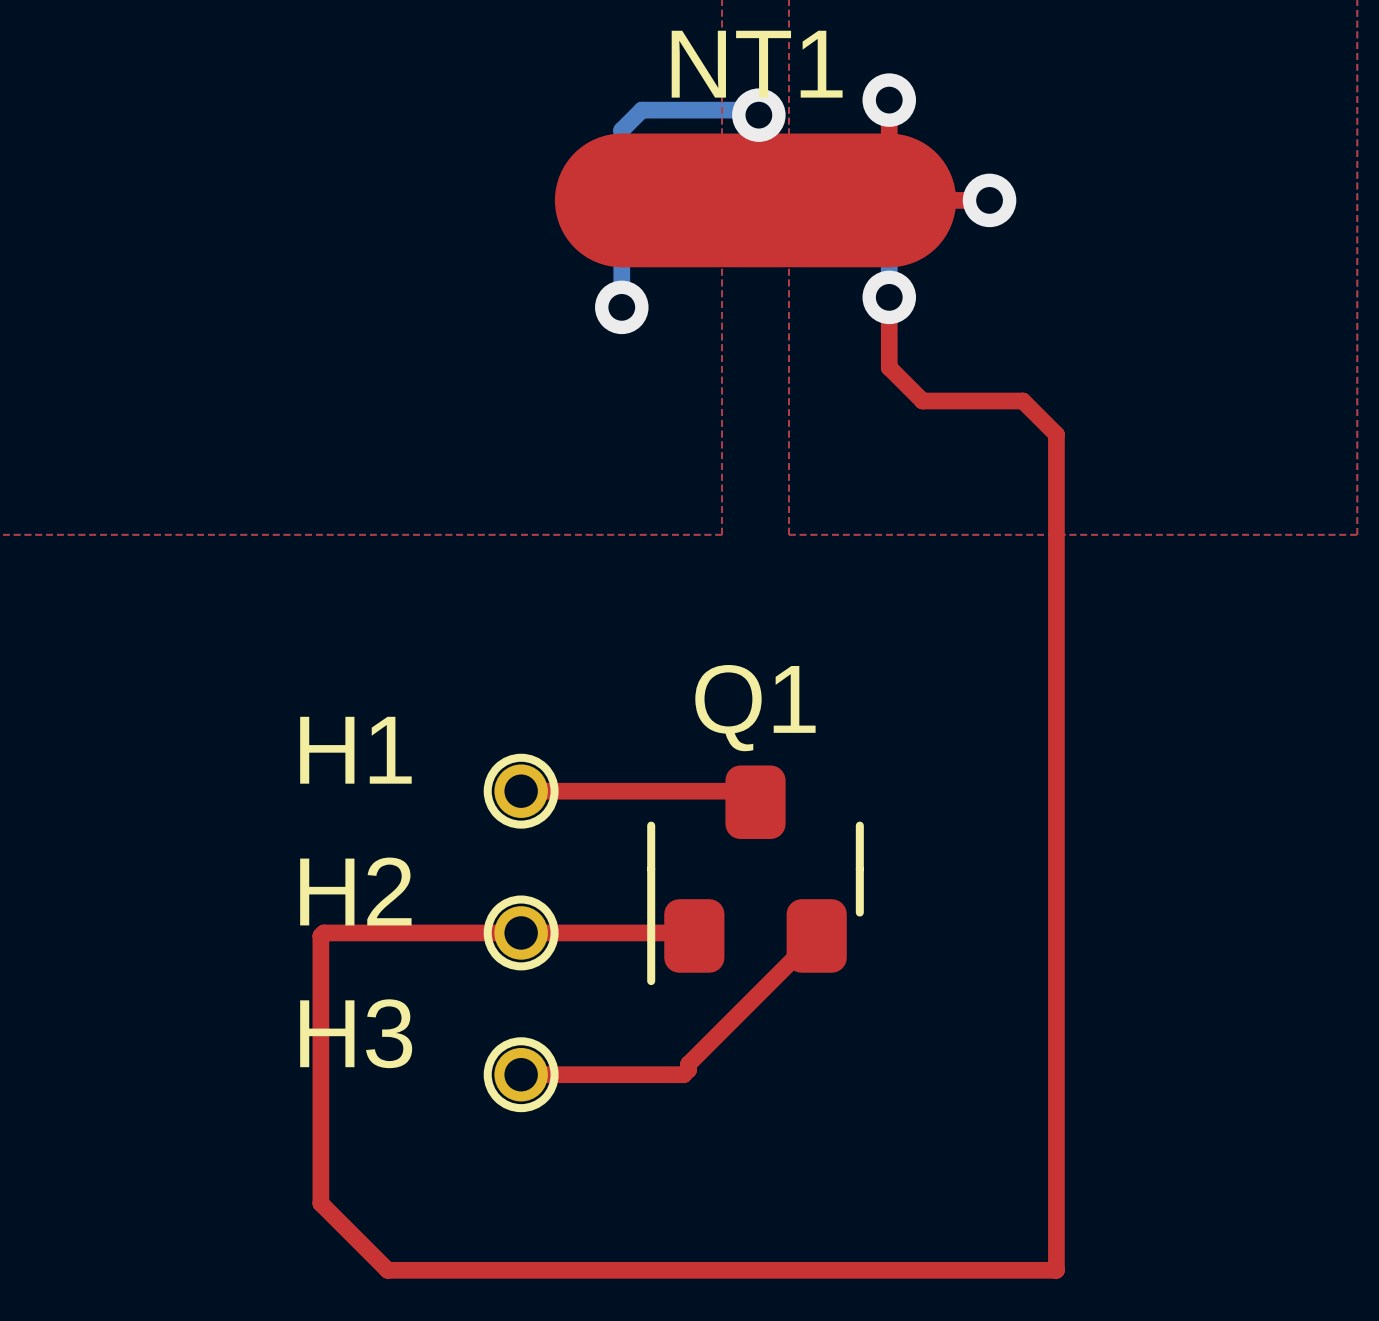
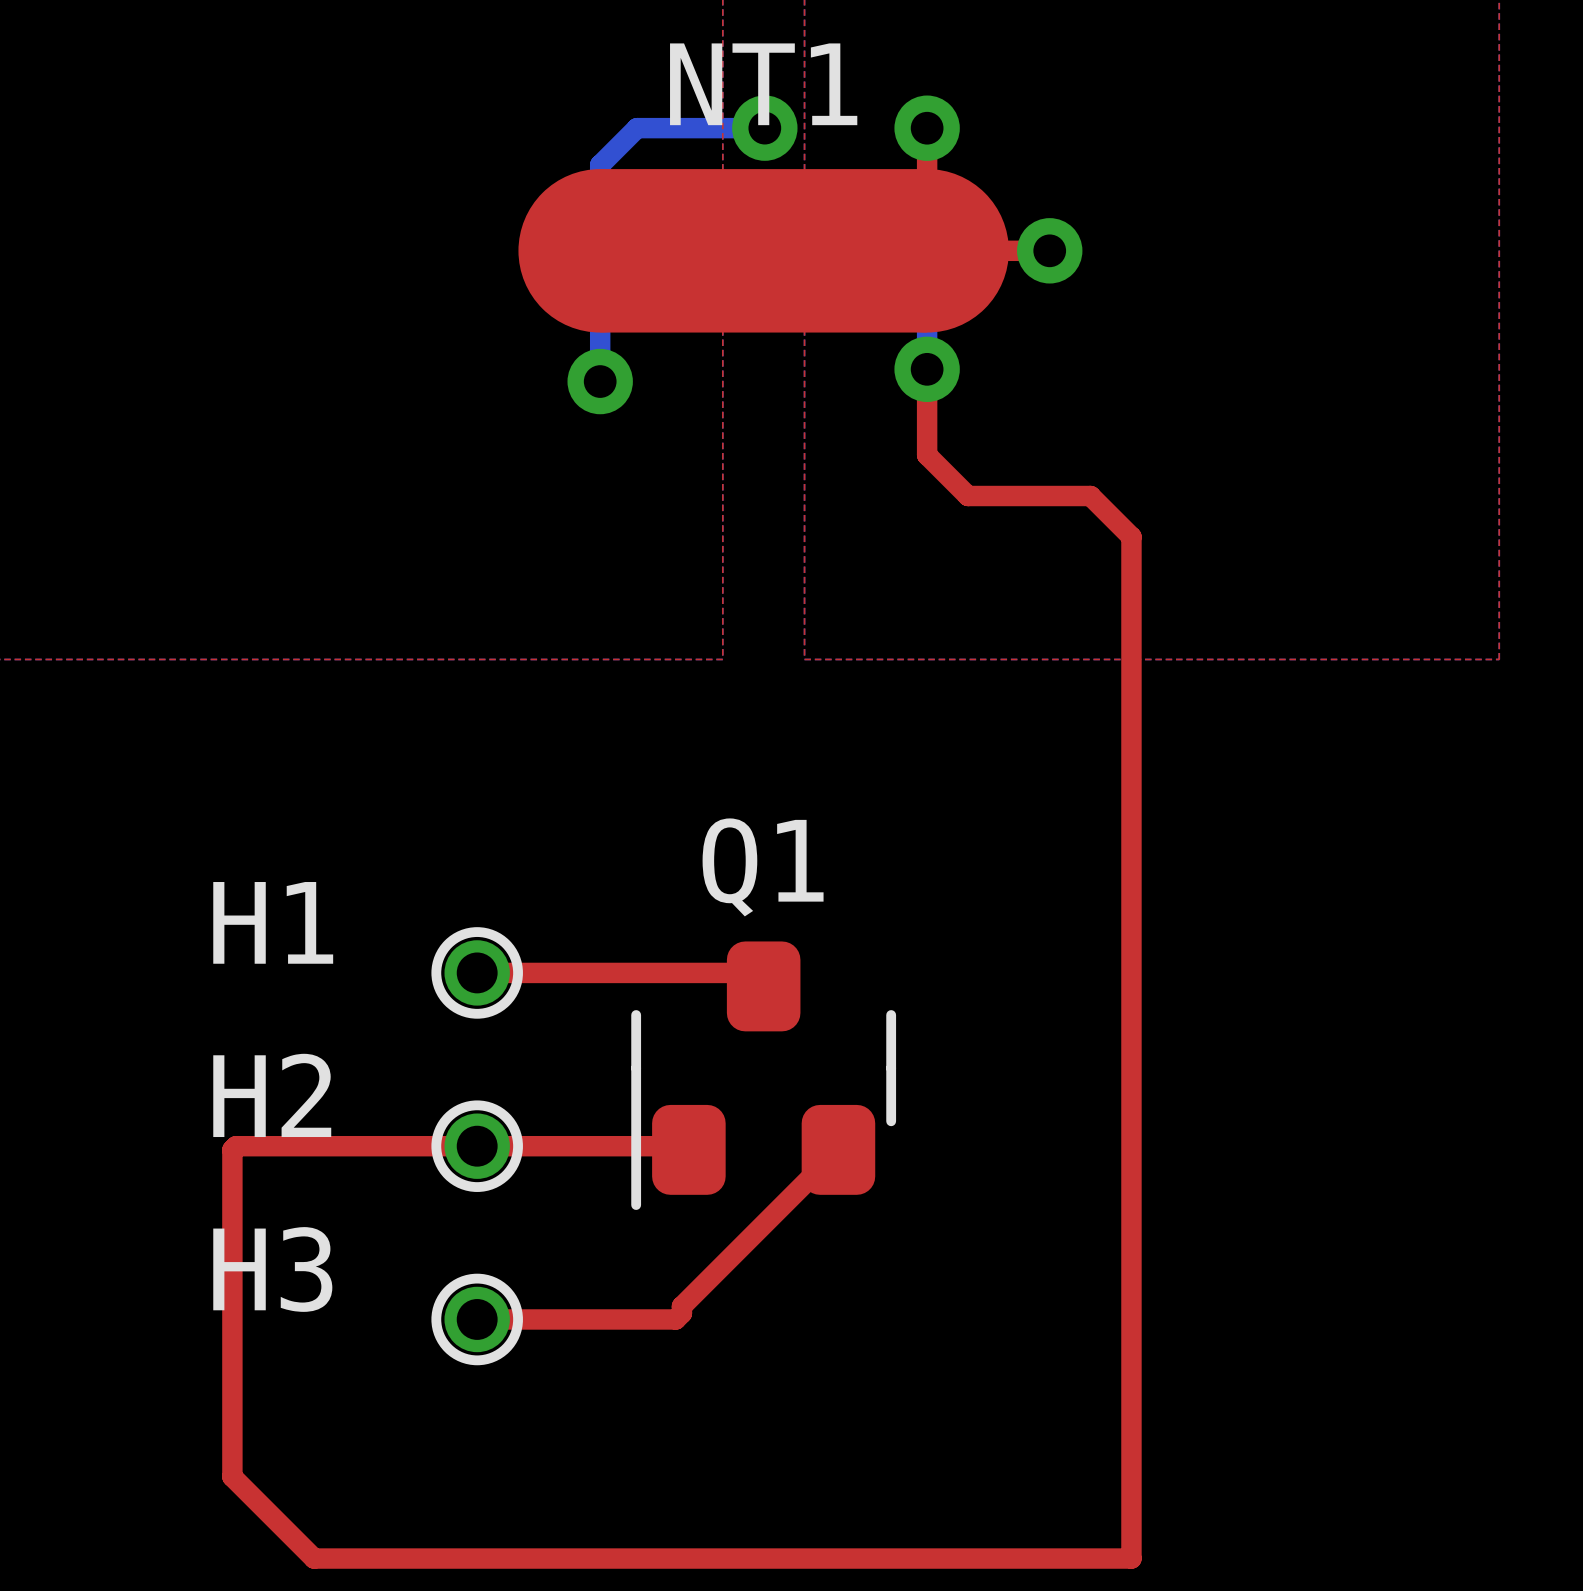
bottom track: (641, 110) (753, 110) (758, 115) -> (624, 140) (637, 128) (764, 128)
via position: (758, 115) -> (764, 128)

